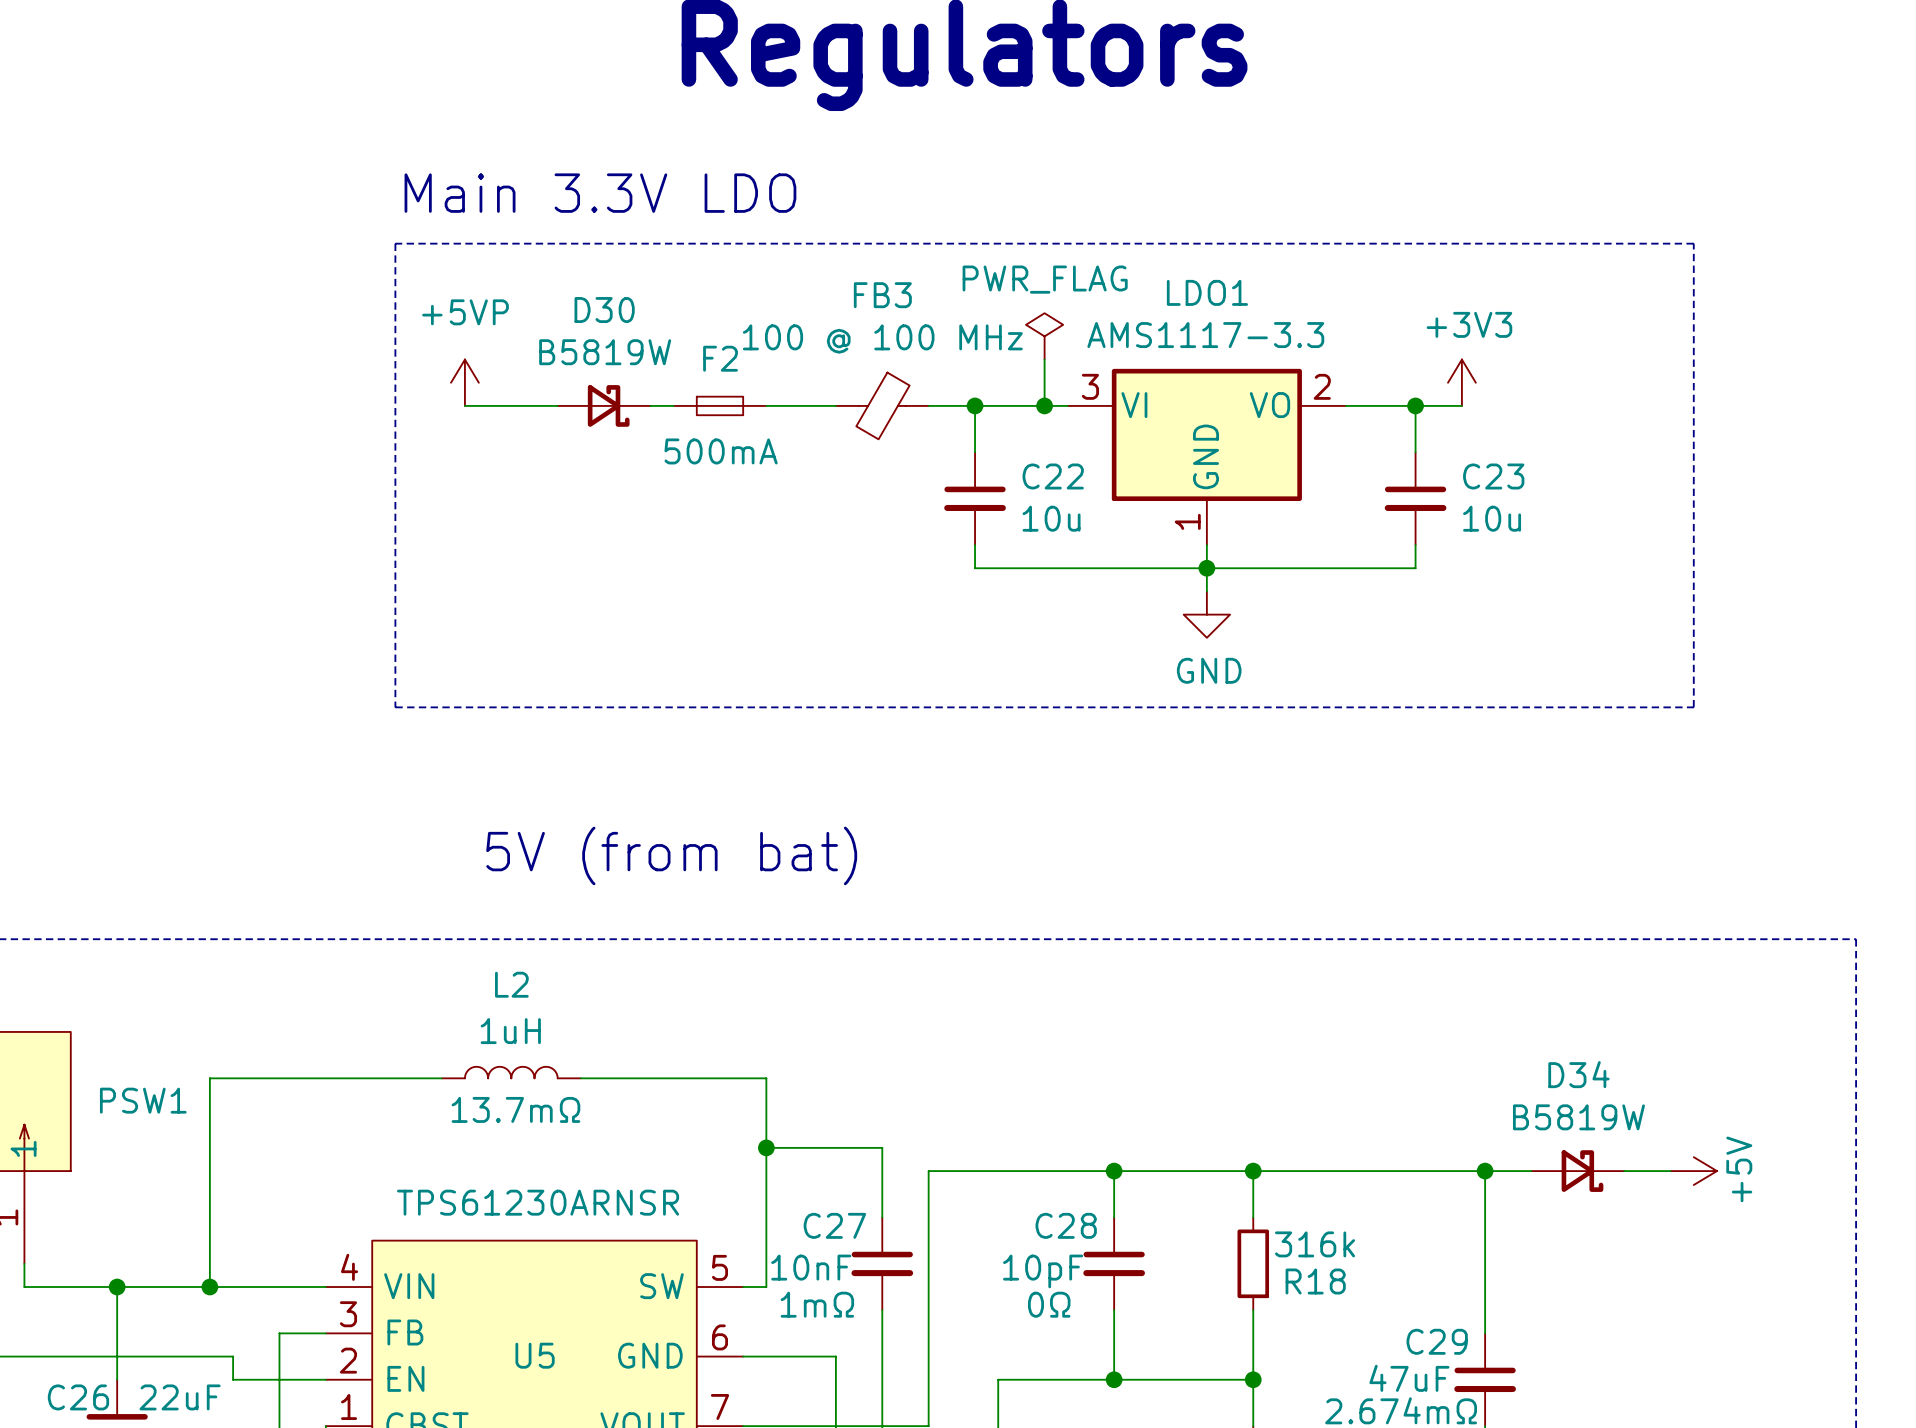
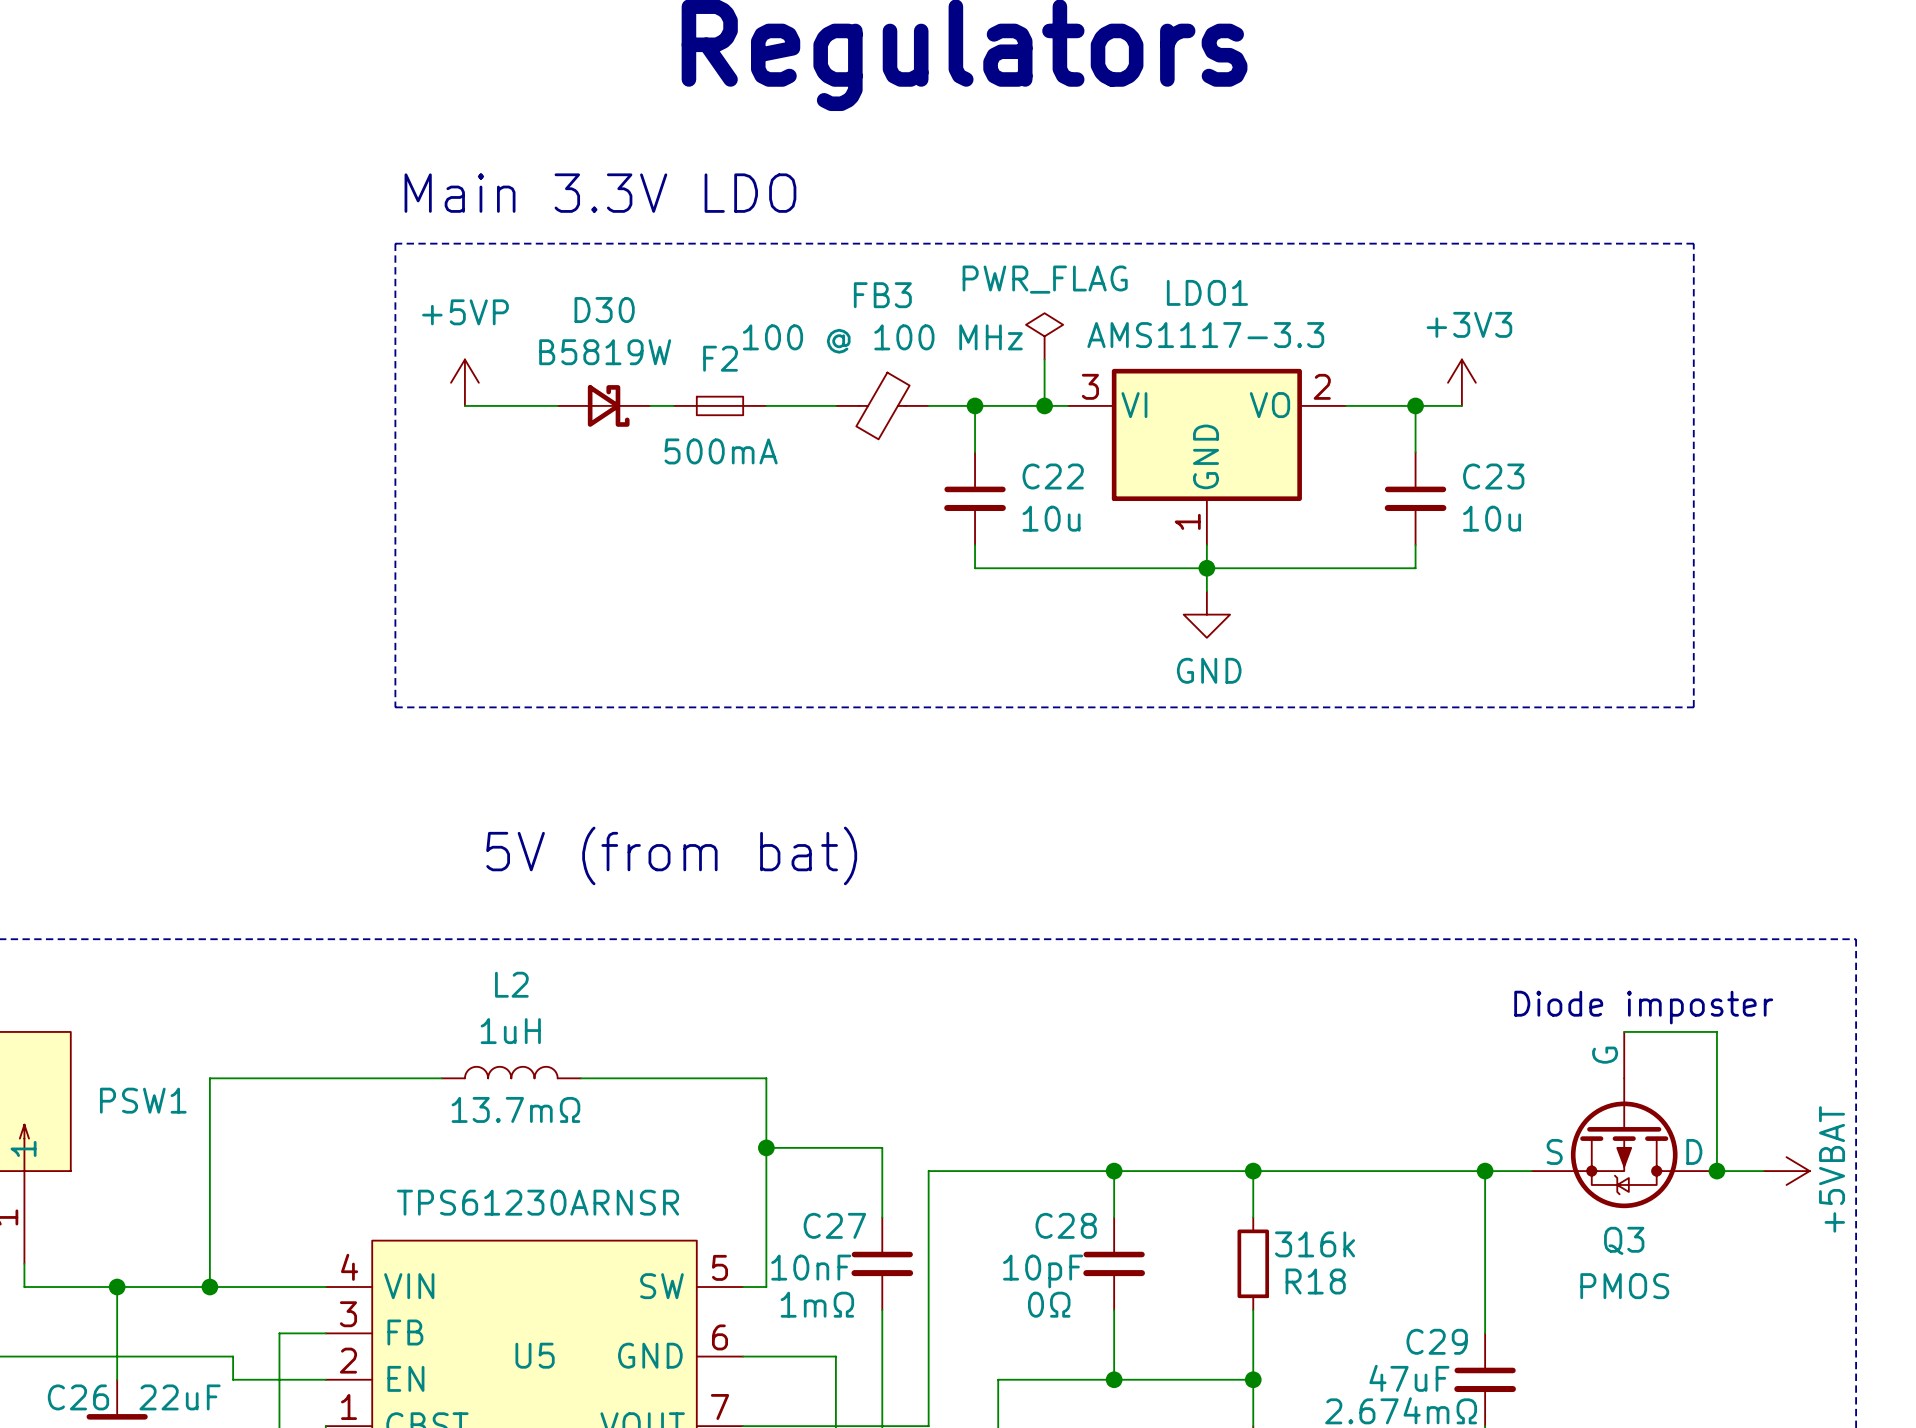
text: none -> Diode imposter (1643, 1007)
wire: none -> (1624, 1031) (1716, 1031) (1716, 1171) (1763, 1171)
Q3: none -> PMOS (1624, 1120)
D34: B5819W (1577, 1171) -> none
wire: (1624, 1171) (1670, 1171) -> none
power symbol: +5V (1693, 1171) -> none
junction: none -> (1716, 1171)
power symbol: none -> +5VBAT (1786, 1171)

